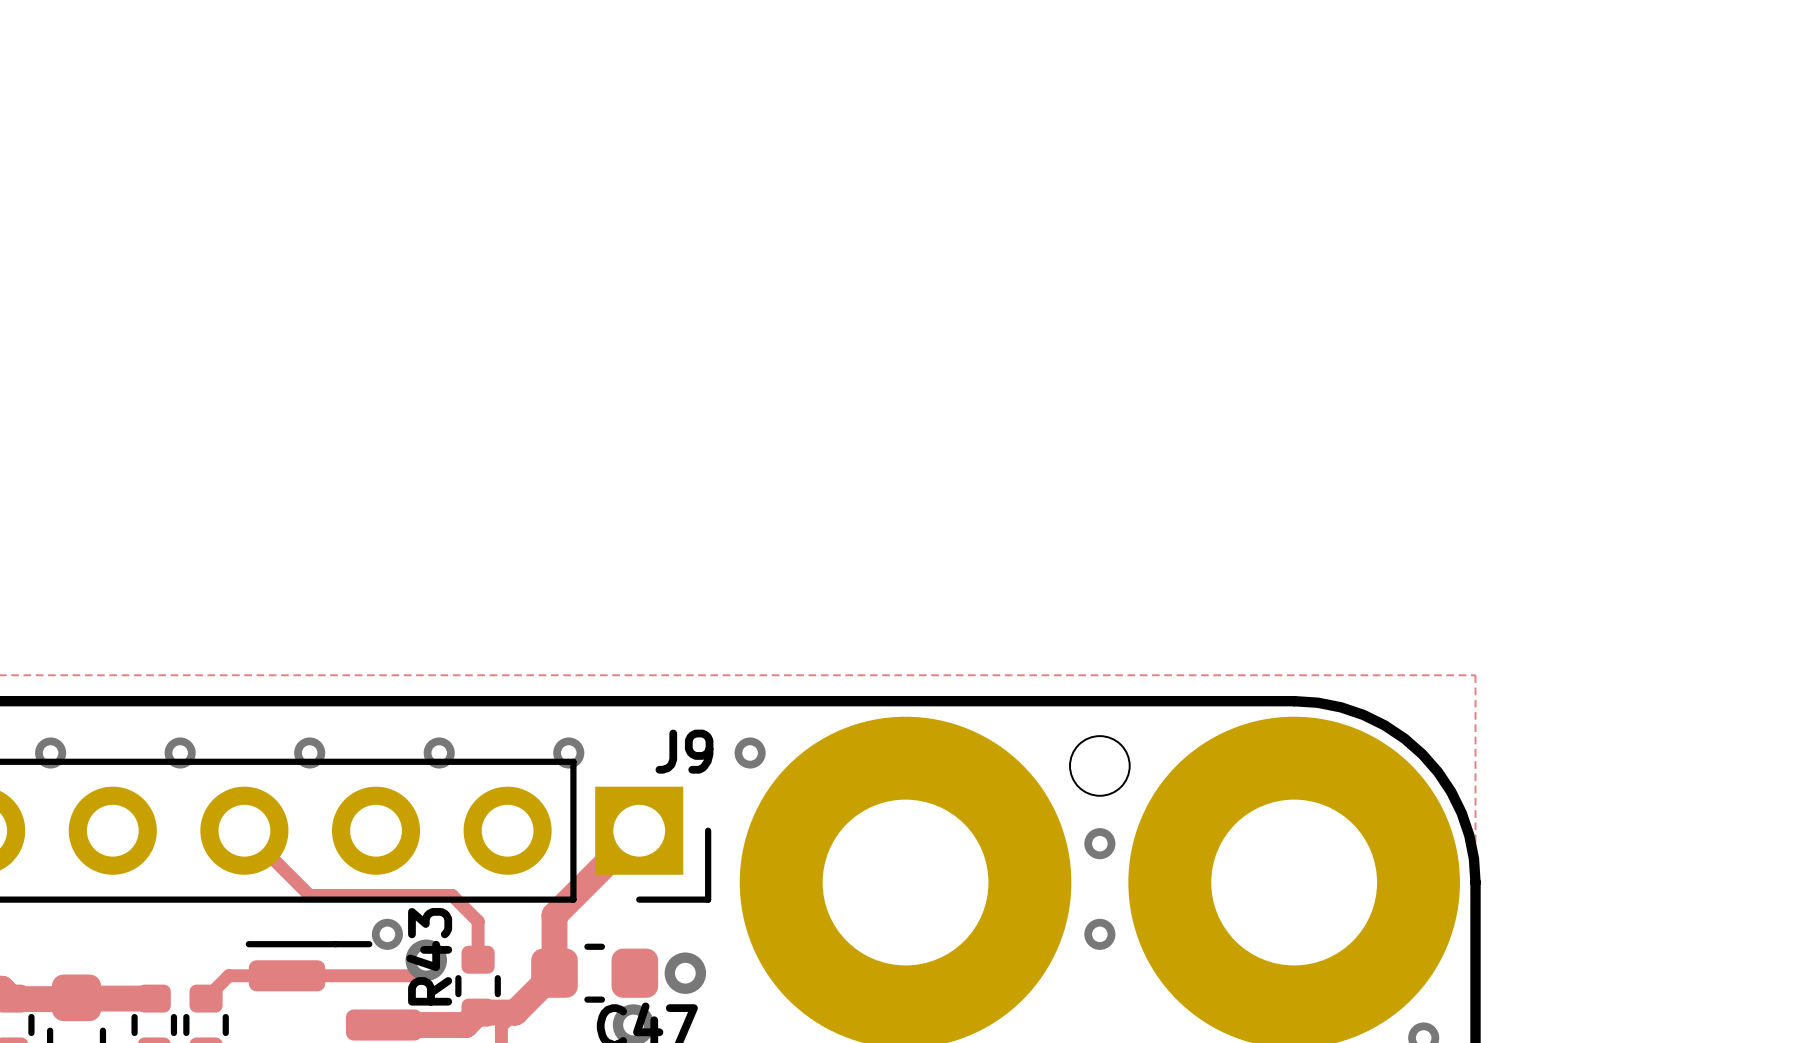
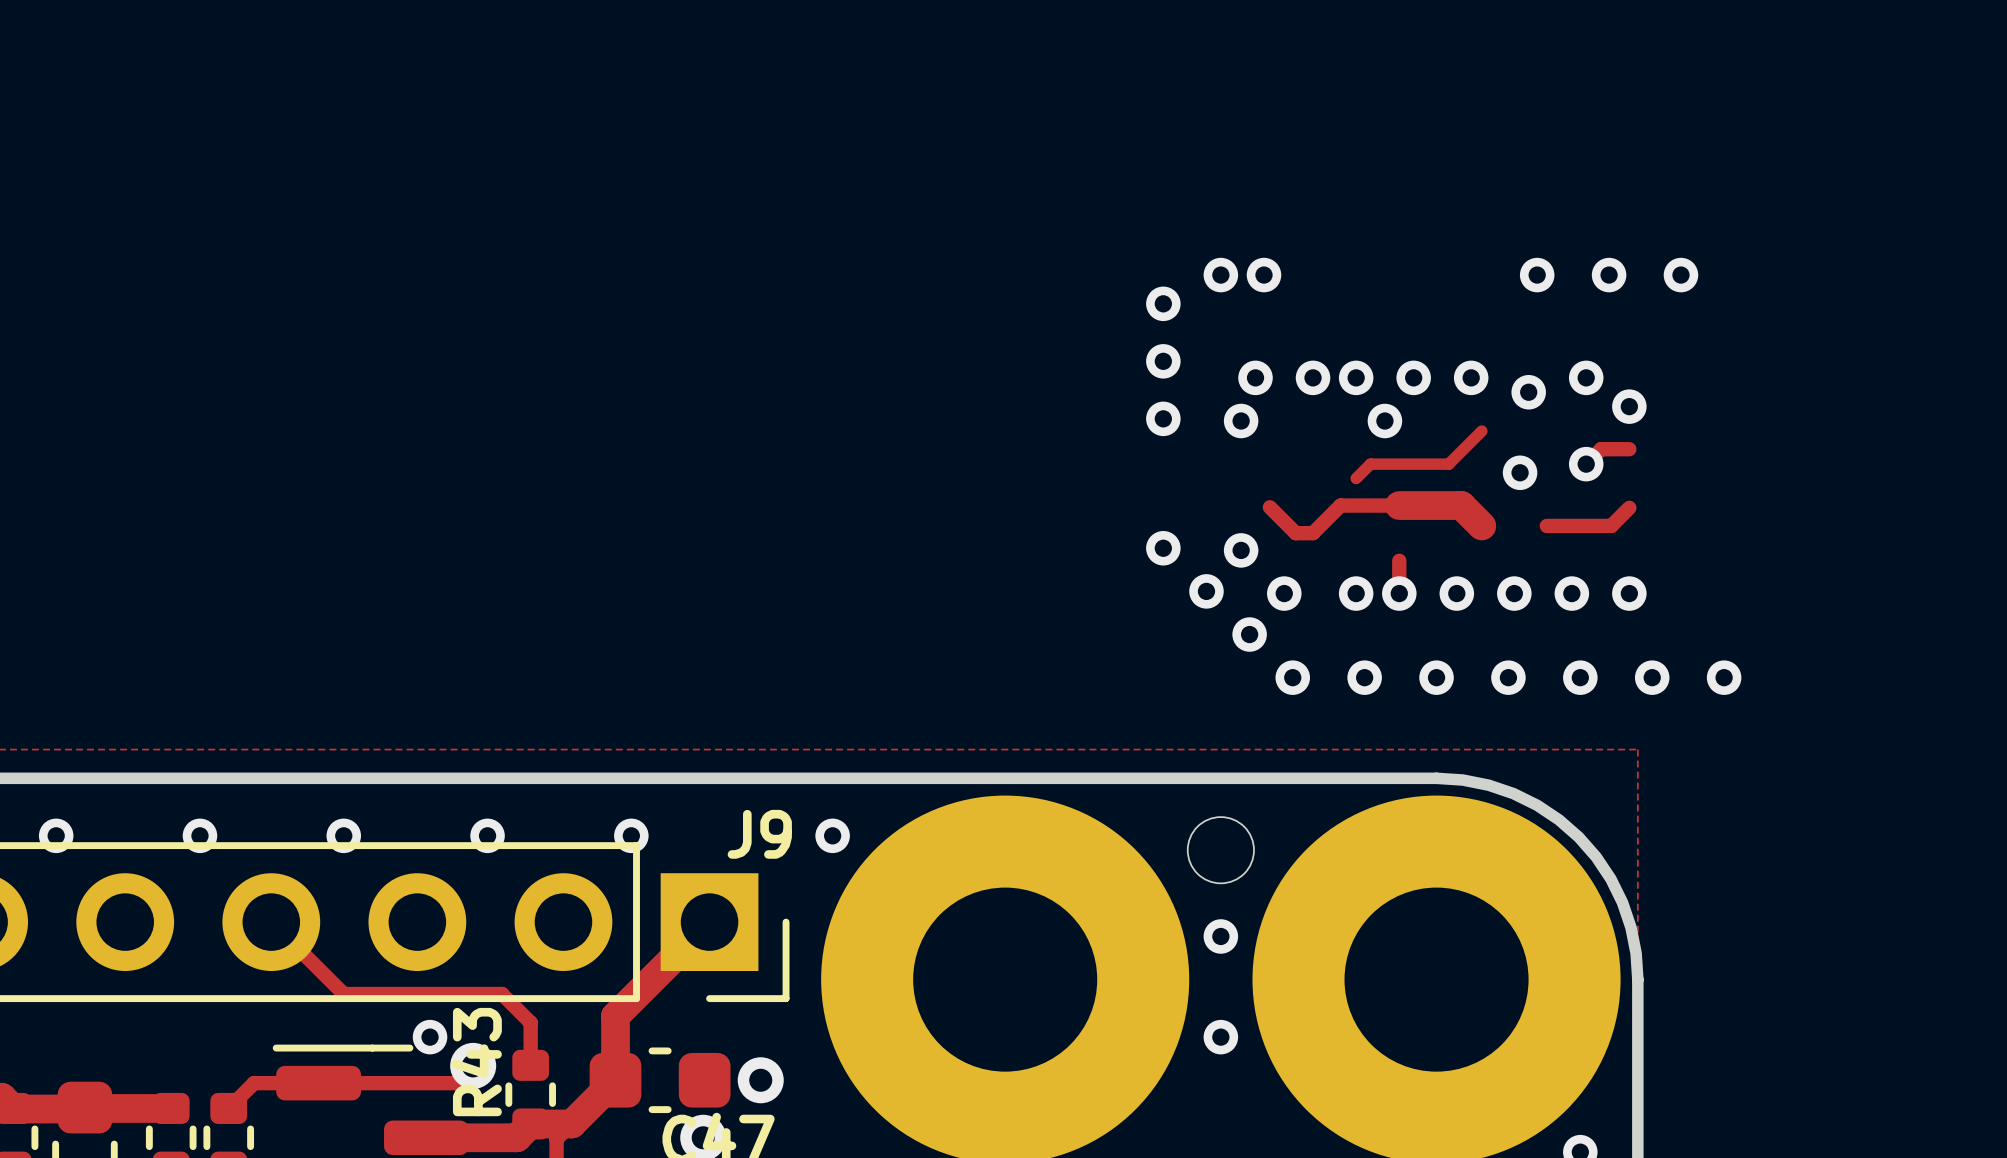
via: none -> (1220, 275)
via: none -> (1263, 275)
via: none -> (1537, 275)
via: none -> (1609, 275)
via: none -> (1680, 275)
via: none -> (1163, 303)
via: none -> (1163, 361)
via: none -> (1255, 377)
via: none -> (1313, 377)
via: none -> (1356, 377)
via: none -> (1413, 377)
via: none -> (1471, 377)
via: none -> (1586, 377)
via: none -> (1528, 392)
via: none -> (1629, 406)
via: none -> (1163, 418)
via: none -> (1241, 421)
via: none -> (1384, 421)
track: none -> (1481, 431) (1448, 464) (1370, 464) (1356, 478)
track: none -> (1629, 449) (1601, 449) (1586, 464)
via: none -> (1586, 464)
via: none -> (1520, 472)
track: none -> (1269, 507) (1295, 533) (1313, 533) (1340, 505) (1461, 505) (1481, 525)
track: none -> (1629, 507) (1611, 525) (1546, 525)
via: none -> (1163, 548)
via: none -> (1241, 550)
track: none -> (1399, 560) (1399, 593)
via: none -> (1206, 591)
via: none -> (1284, 593)
via: none -> (1356, 593)
via: none -> (1399, 593)
via: none -> (1456, 593)
via: none -> (1514, 593)
via: none -> (1571, 593)
via: none -> (1629, 593)
via: none -> (1249, 634)
via: none -> (1292, 677)
via: none -> (1364, 677)
via: none -> (1436, 677)
via: none -> (1508, 677)
via: none -> (1580, 677)
via: none -> (1652, 677)
via: none -> (1724, 677)

